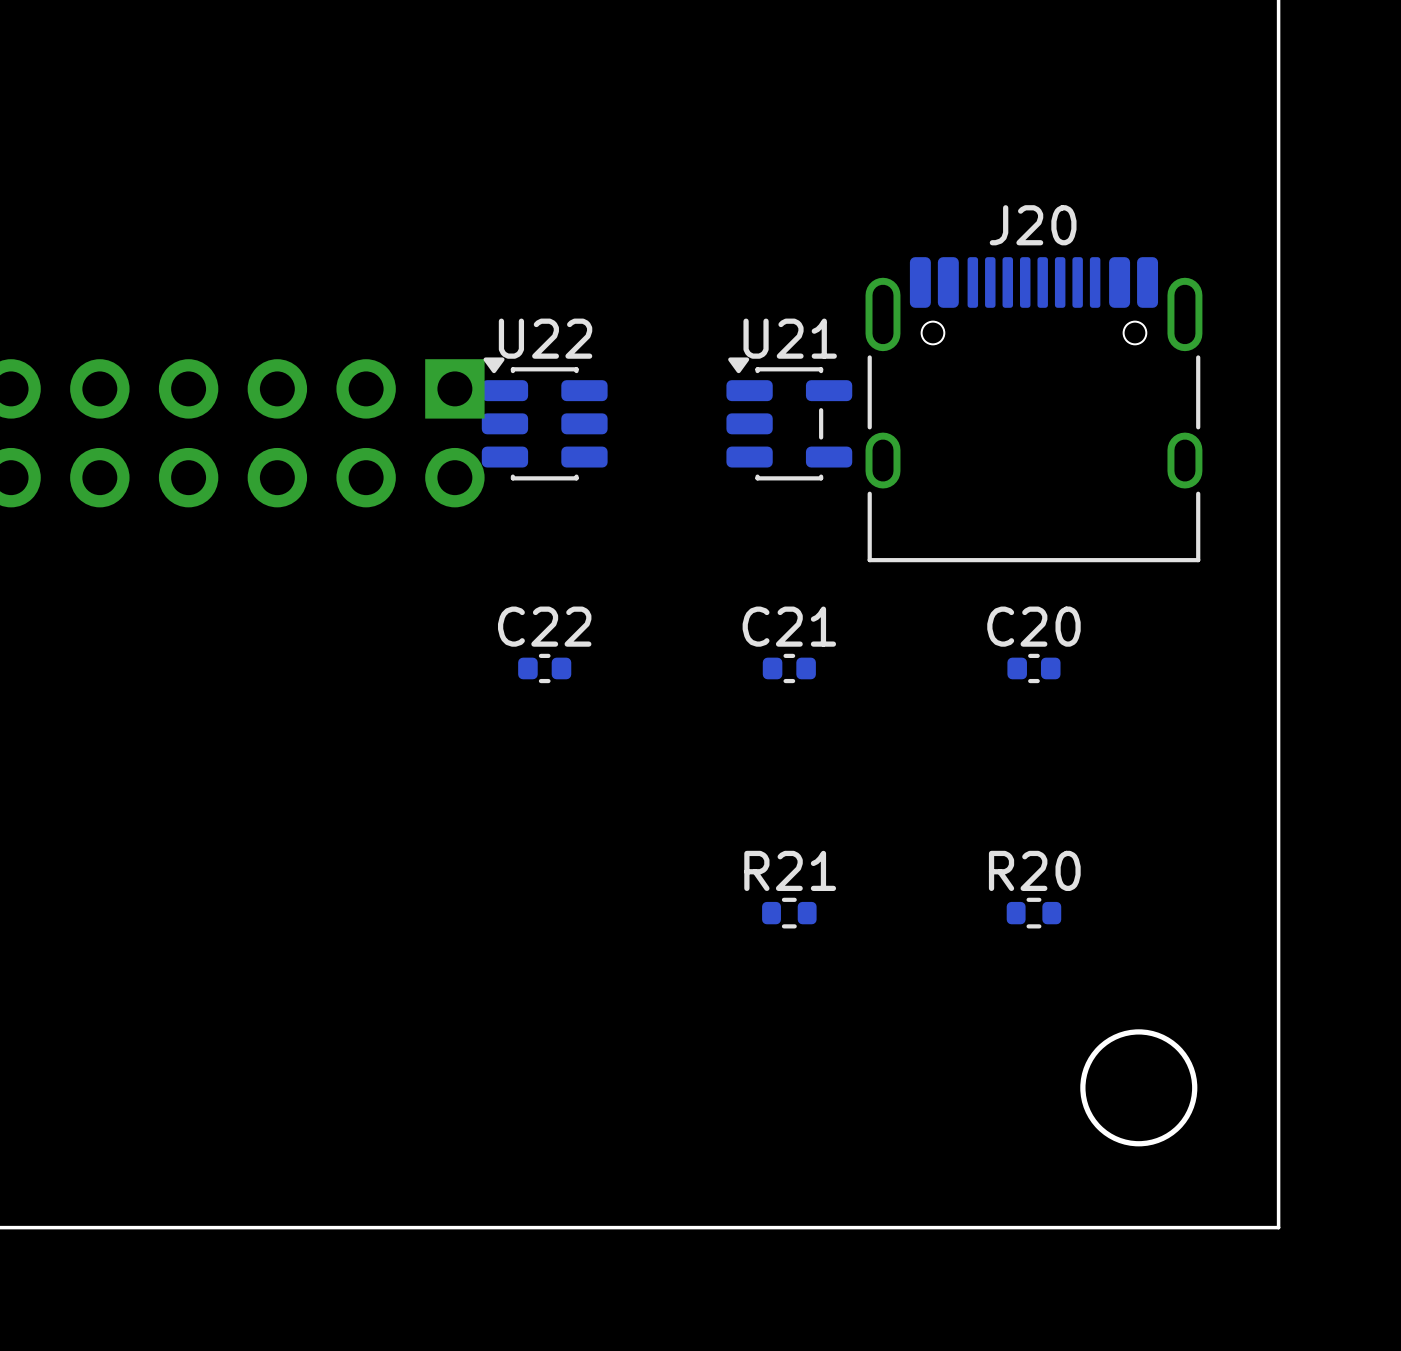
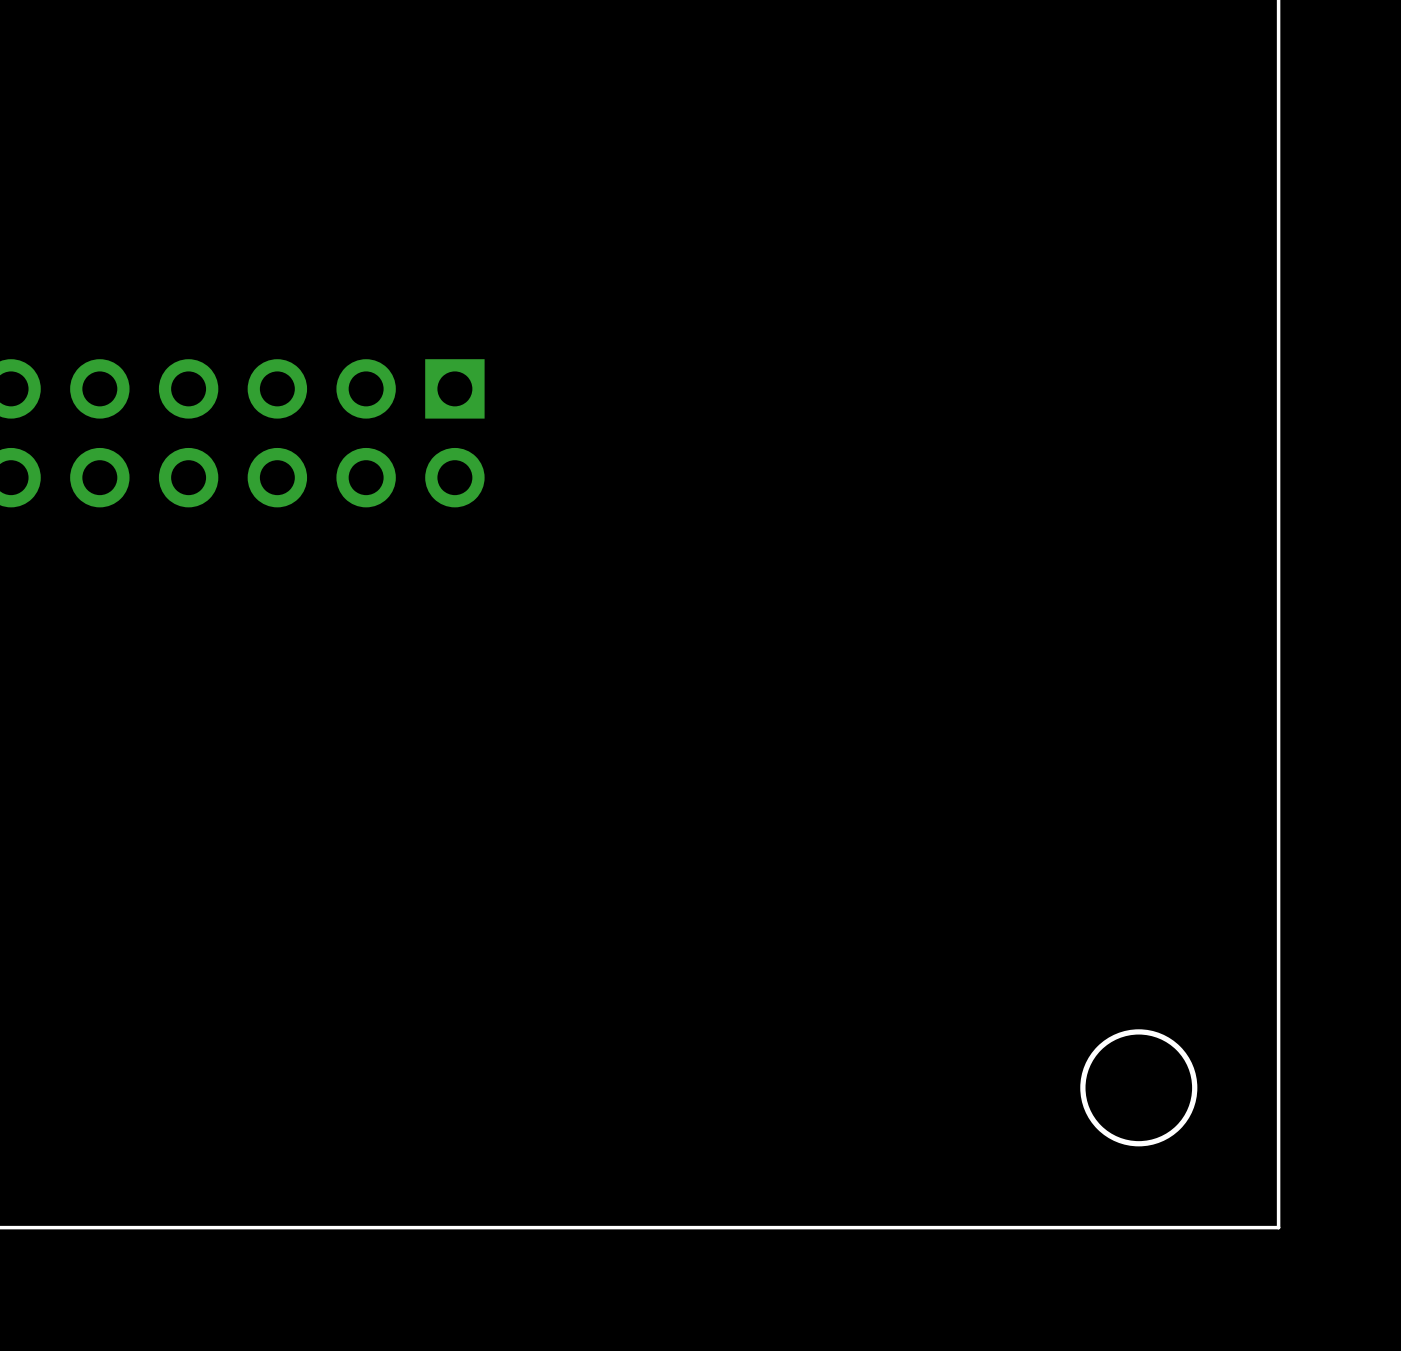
J20: (1033, 409) -> none
U22: (544, 418) -> none
U21: (789, 418) -> none
C22: (544, 668) -> none
C21: (789, 668) -> none
C20: (1033, 668) -> none
R21: (789, 913) -> none
R20: (1033, 913) -> none

